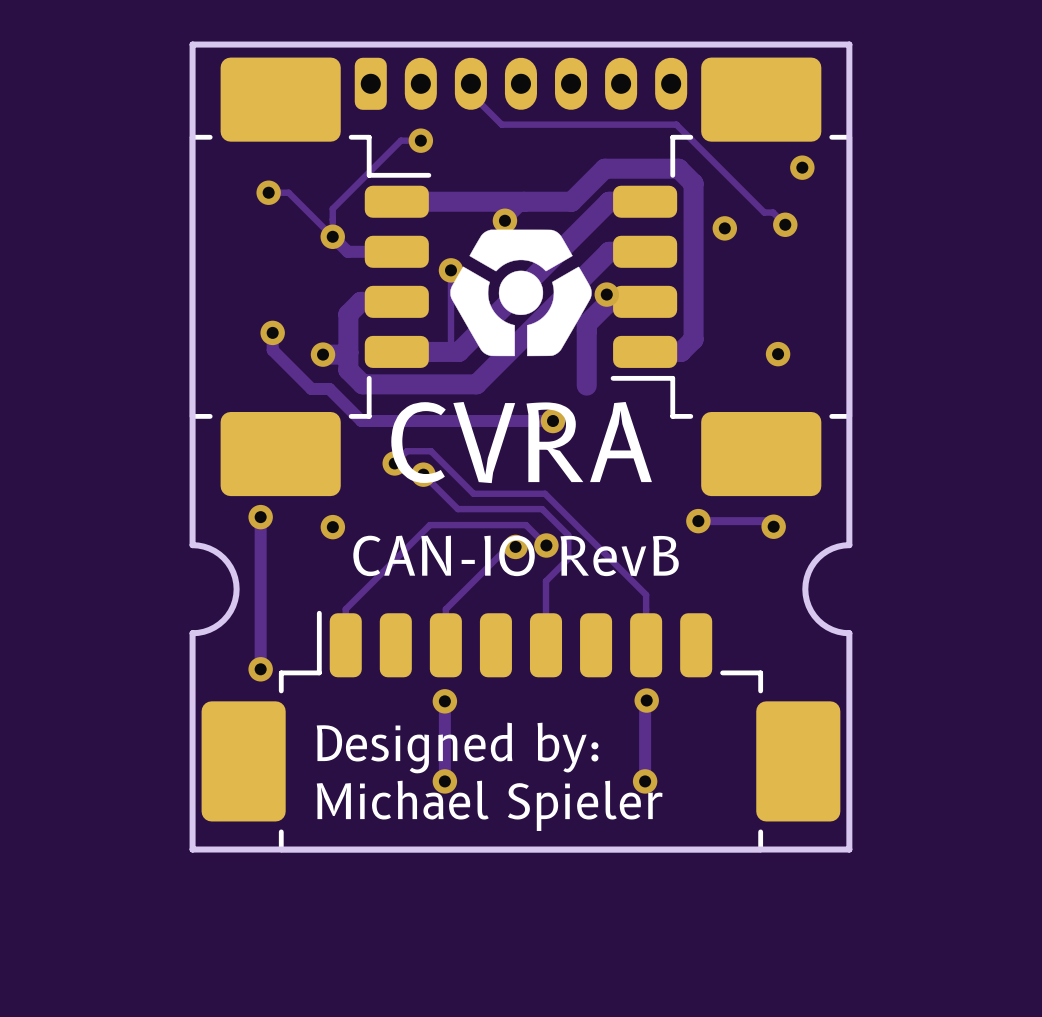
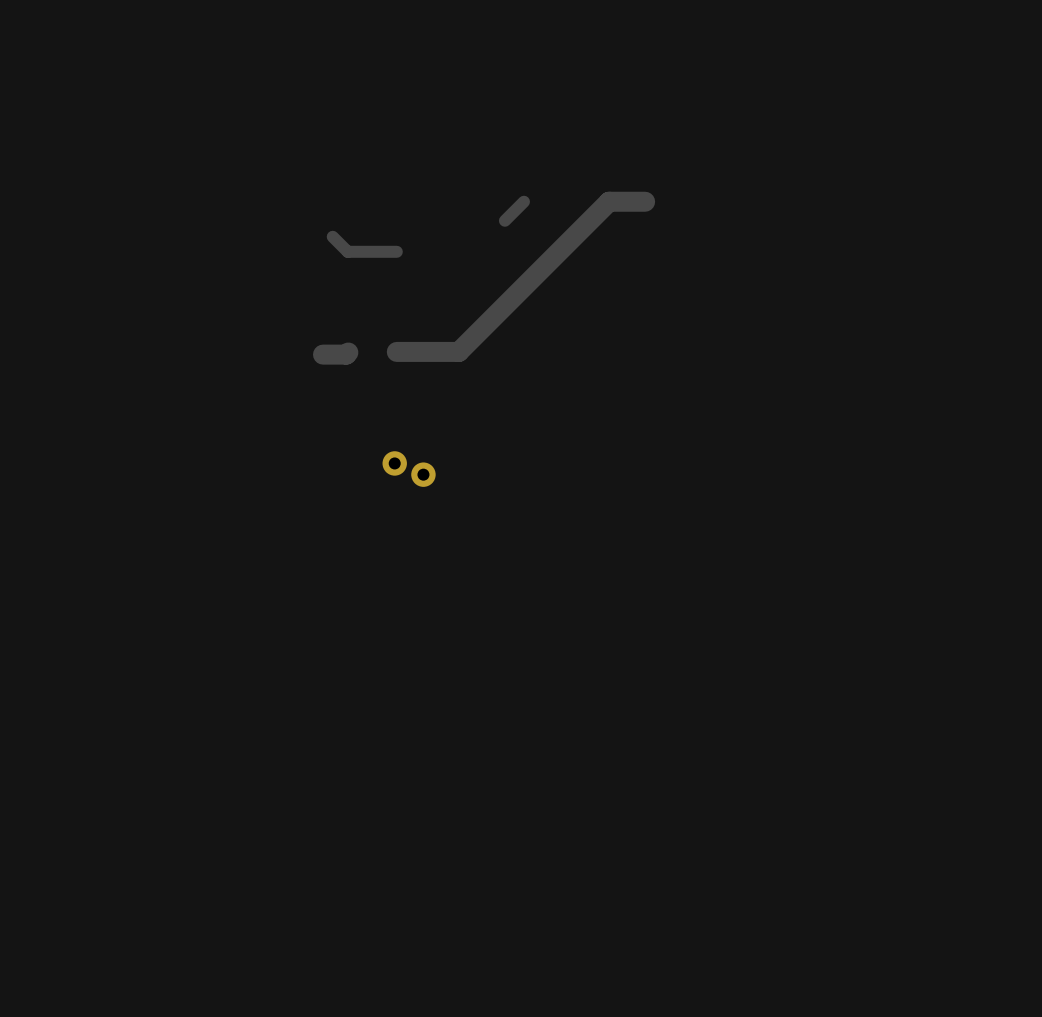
board edge: (849, 44) (849, 545) (832, 548) (818, 558) (808, 572) (805, 589) (808, 606) (818, 620) (832, 629) (849, 633) (849, 849) (192, 849) (192, 633) (209, 629) (223, 620) (233, 606) (236, 589) (233, 572) (223, 558) (209, 548) (192, 545) (192, 44) (849, 44) -> none
track: (470, 83) (470, 93) (501, 124) (676, 124) (764, 212) (773, 212) (785, 224) -> none
part: (520, 83) -> none
track: (420, 140) (400, 140) (332, 208) (332, 236) (288, 192) (268, 192) -> none
via: (420, 140) -> none
via: (802, 167) -> none
via: (268, 192) -> none
track: (396, 201) (571, 201) (604, 168) (678, 168) (693, 183) (693, 339) (681, 351) (645, 351) -> none
via: (504, 220) -> none
via: (785, 224) -> none
via: (724, 228) -> none
drawing: [450, 229, 592, 357] -> none
via: (332, 236) -> none
track: (645, 251) (609, 251) (476, 384) (362, 384) (348, 370) (348, 314) (360, 301) (396, 301) -> none
track: (450, 270) (450, 344) (458, 351) -> none
via: (450, 270) -> none
part: (310, 276) -> none
part: (731, 276) -> none
via: (606, 294) -> none
track: (645, 301) (609, 301) (586, 324) (586, 385) -> none
track: (272, 332) (272, 350) (311, 388) (329, 388) (361, 421) (553, 421) -> none
via: (272, 332) -> none
via: (323, 354) -> none
via: (778, 354) -> none
via: (553, 421) -> none
text: CVRA (521, 442) -> none
track: (394, 463) (406, 451) (431, 451) (473, 493) (544, 493) (646, 594) (646, 645) -> none
track: (423, 474) (457, 509) (542, 509) (568, 535) (568, 558) (545, 581) (545, 645) -> none
track: (260, 517) (260, 669) -> none
via: (260, 517) -> none
track: (698, 521) (768, 521) (773, 526) -> none
via: (698, 521) -> none
via: (773, 526) -> none
via: (332, 527) -> none
track: (546, 545) (526, 525) (429, 525) (345, 609) (345, 645) -> none
via: (546, 545) -> none
track: (515, 546) (508, 546) (445, 609) (445, 645) -> none
via: (515, 546) -> none
text: CAN-IO RevB (516, 555) -> none
via: (260, 669) -> none
track: (646, 700) (645, 702) (645, 781) -> none
via: (646, 700) -> none
track: (444, 701) (444, 781) (445, 705) -> none
via: (444, 701) -> none
part: (520, 731) -> none
text: Designed by: (457, 748) -> none
via: (444, 781) -> none
via: (645, 781) -> none
text: Michael Spieler (489, 805) -> none

